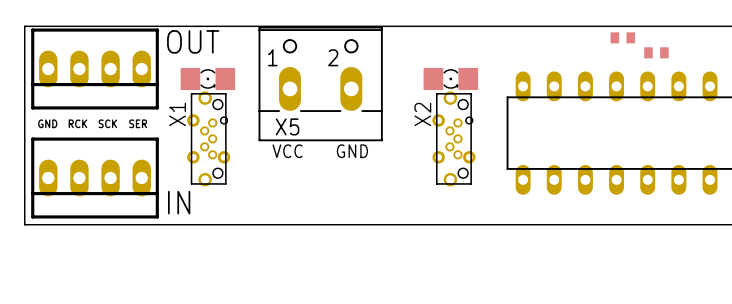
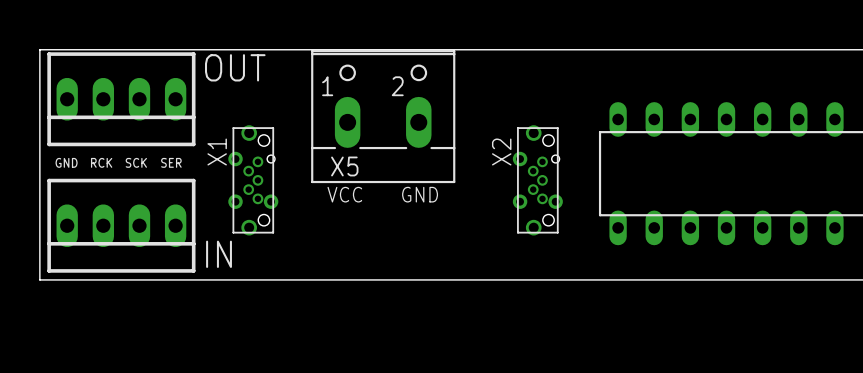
part: (622, 37) -> none
part: (656, 52) -> none
part: (207, 78) -> none
part: (450, 78) -> none

